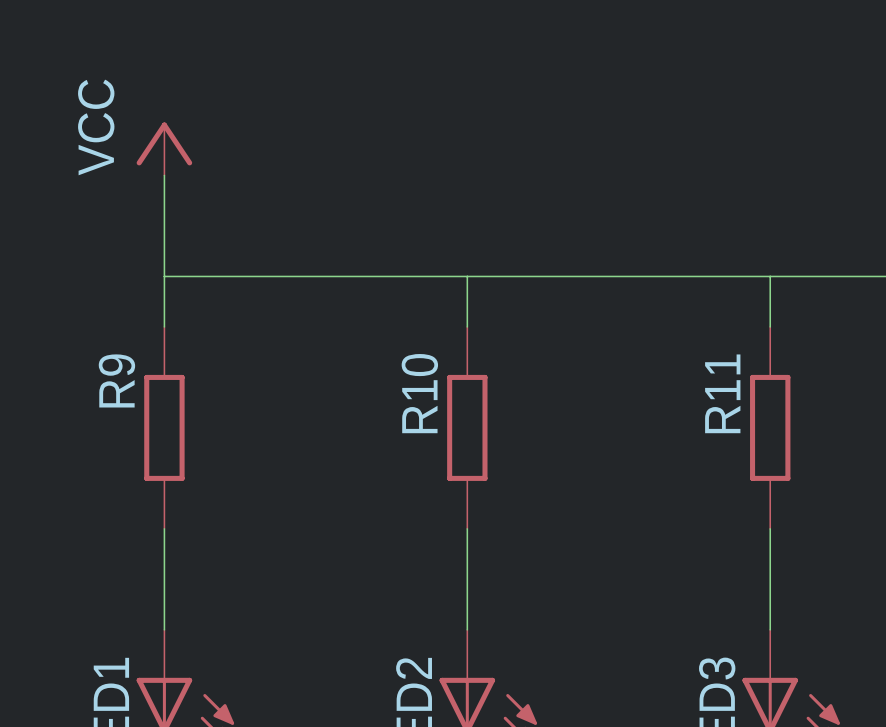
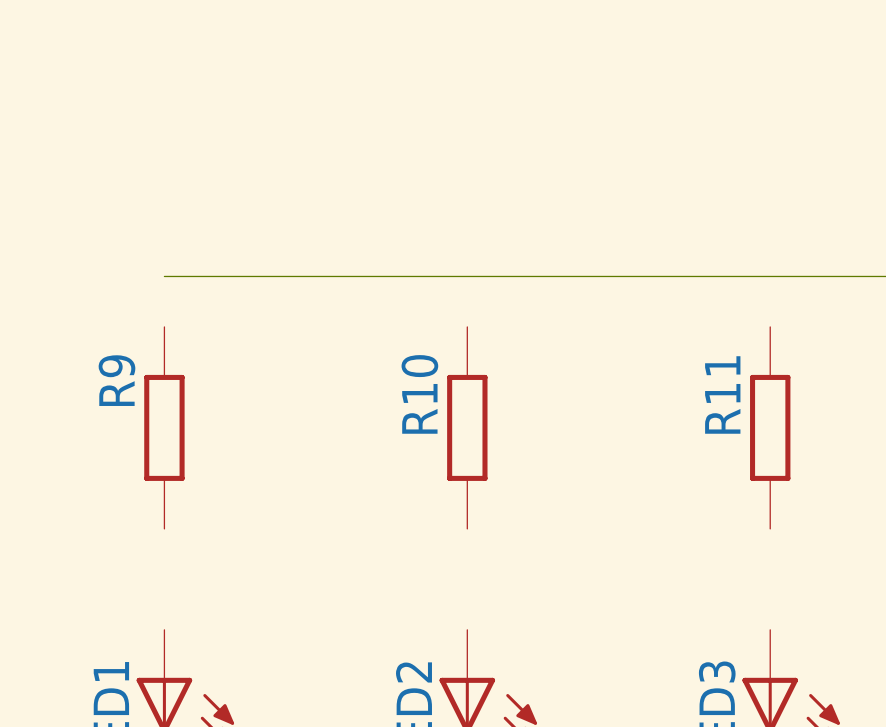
power symbol: VCC (164, 149) -> none
wire: (164, 175) (164, 326) -> none
wire: (467, 276) (467, 326) -> none
wire: (770, 276) (770, 326) -> none
wire: (164, 528) (164, 629) -> none
wire: (467, 528) (467, 629) -> none
wire: (770, 528) (770, 629) -> none

